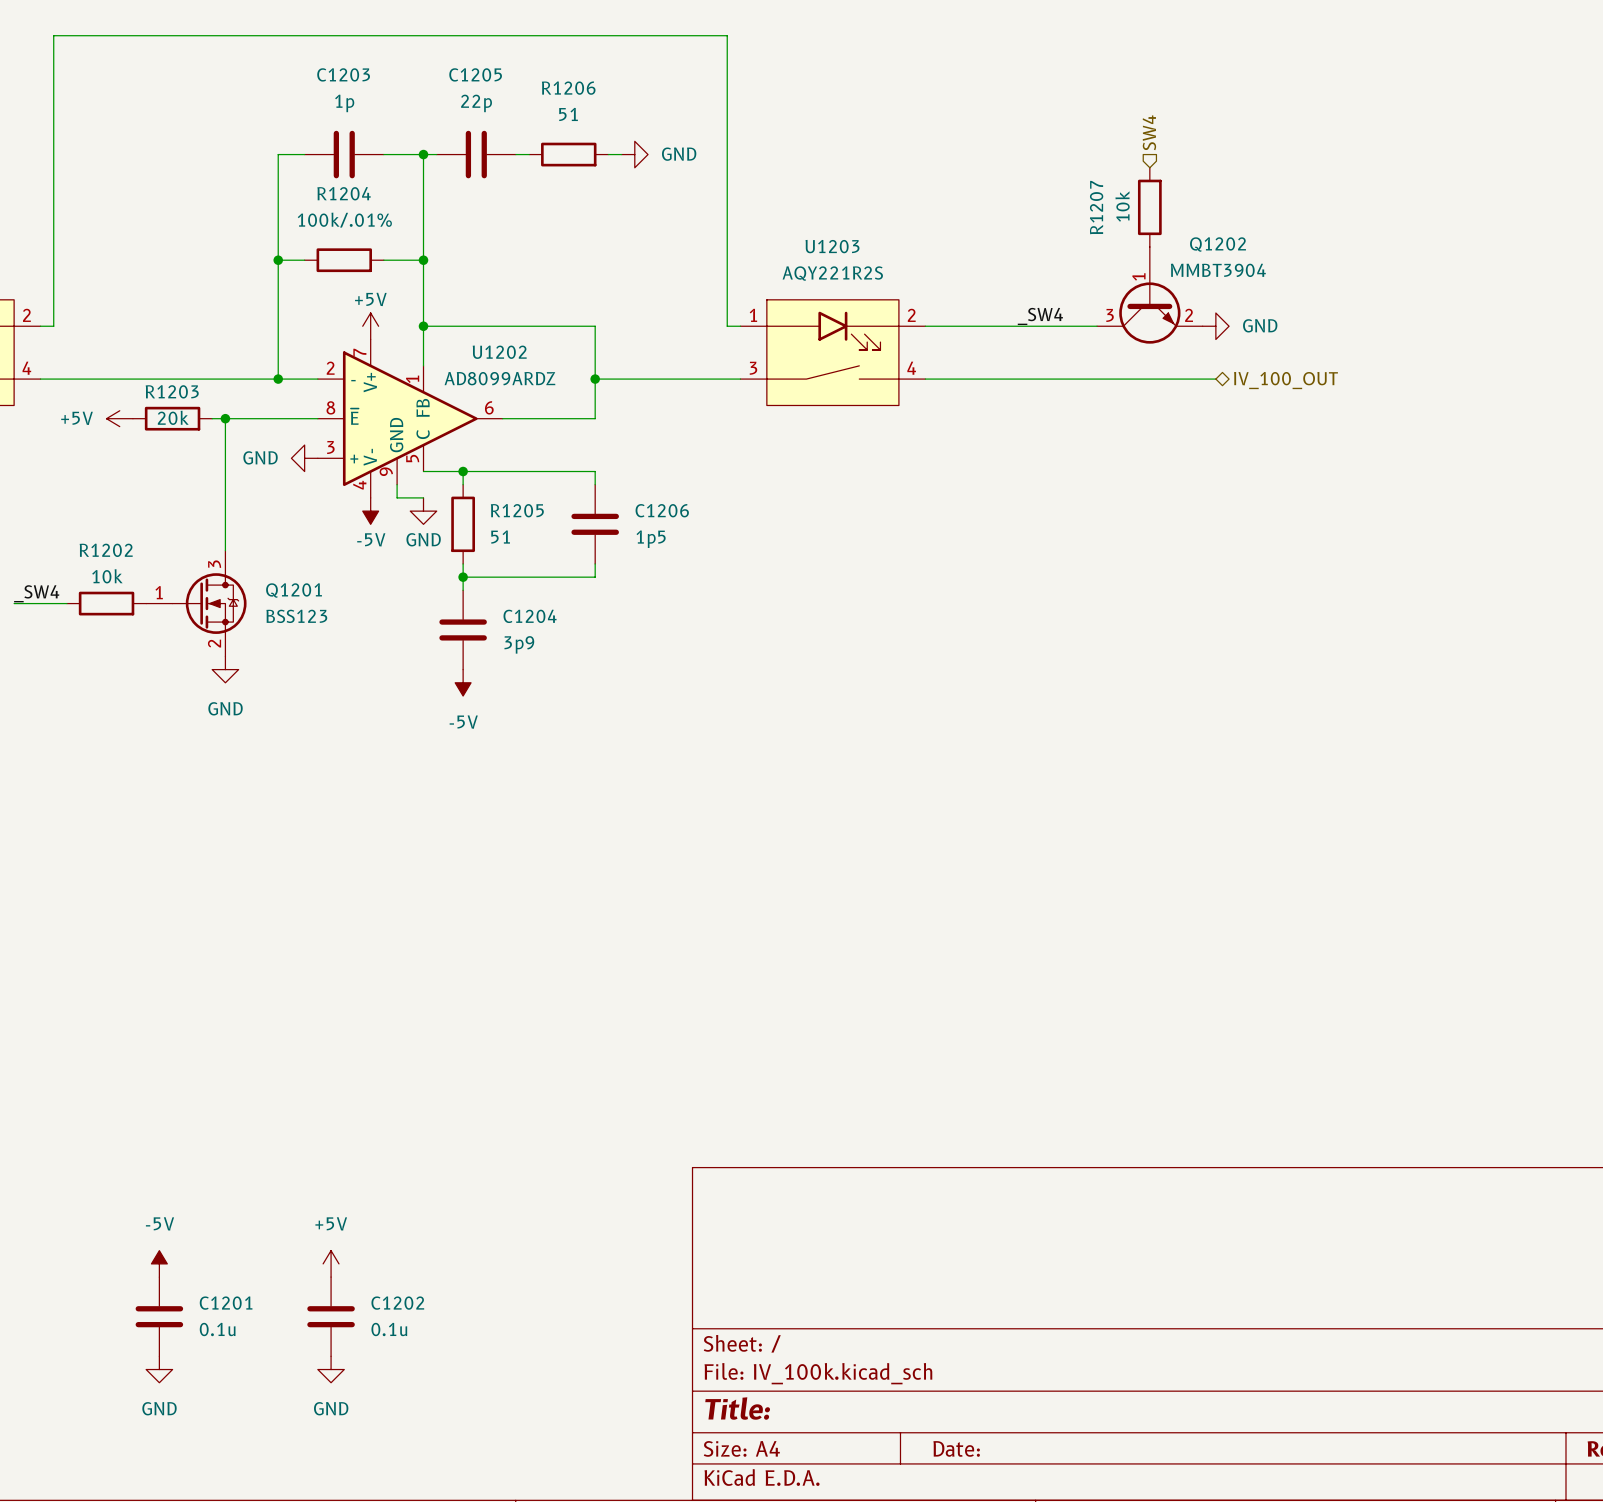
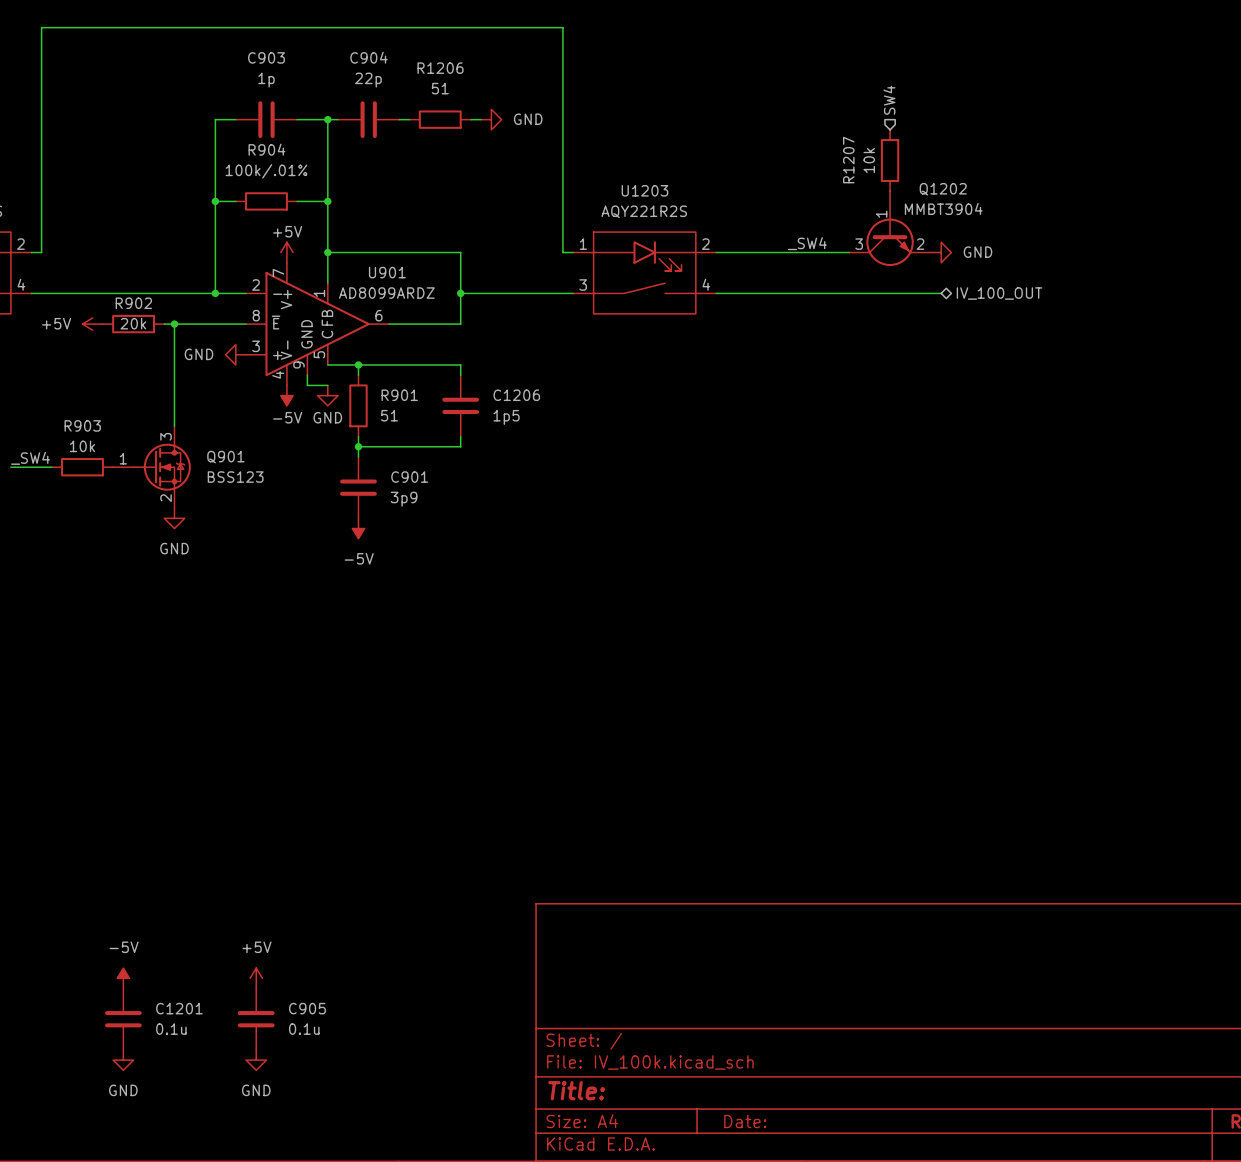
C1203 name: C1203 (343, 74) -> C903 (266, 57)
C1205 name: C1205 (475, 74) -> C904 (368, 57)
R1204 name: R1204 (344, 193) -> R904 (266, 149)
U1202 name: U1202 (499, 352) -> U901 (387, 272)
R1203 name: R1203 (172, 391) -> R902 (133, 303)
R1205 name: R1205 (517, 510) -> R901 (399, 395)
R1202 name: R1202 (106, 550) -> R903 (82, 425)
Q1201 name: Q1201 (294, 590) -> Q901 (225, 457)
C1204 name: C1204 (530, 616) -> C901 (409, 477)
C1202 name: C1202 (397, 1303) -> C905 (307, 1008)

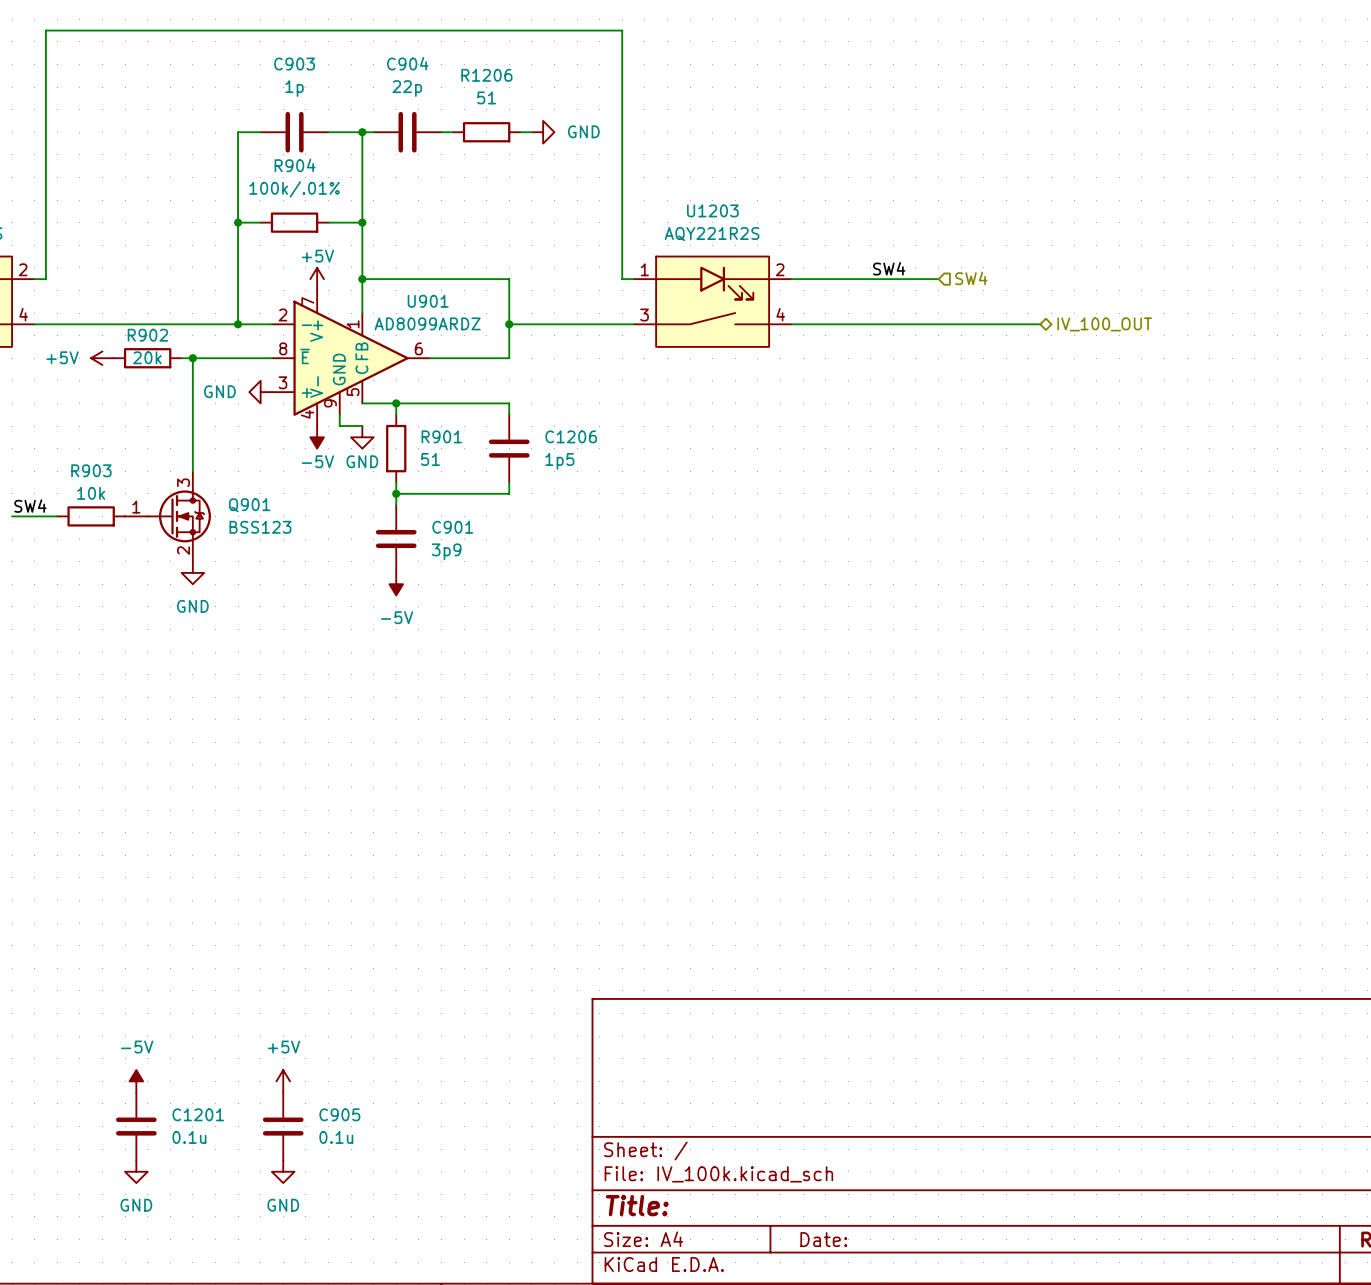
hierarchical label rotation: 0° (889, 100) -> 90° clockwise (971, 278)
hierarchical label position: SW4 (889, 100) -> SW4 (971, 278)
R1207: 10k (890, 160) -> none
Q1202: MMBT3904 (890, 228) -> none
label: _SW4 (807, 243) -> SW4 (889, 268)
power symbol: GND (941, 252) -> none
label: _SW4 (30, 458) -> SW4 (30, 506)

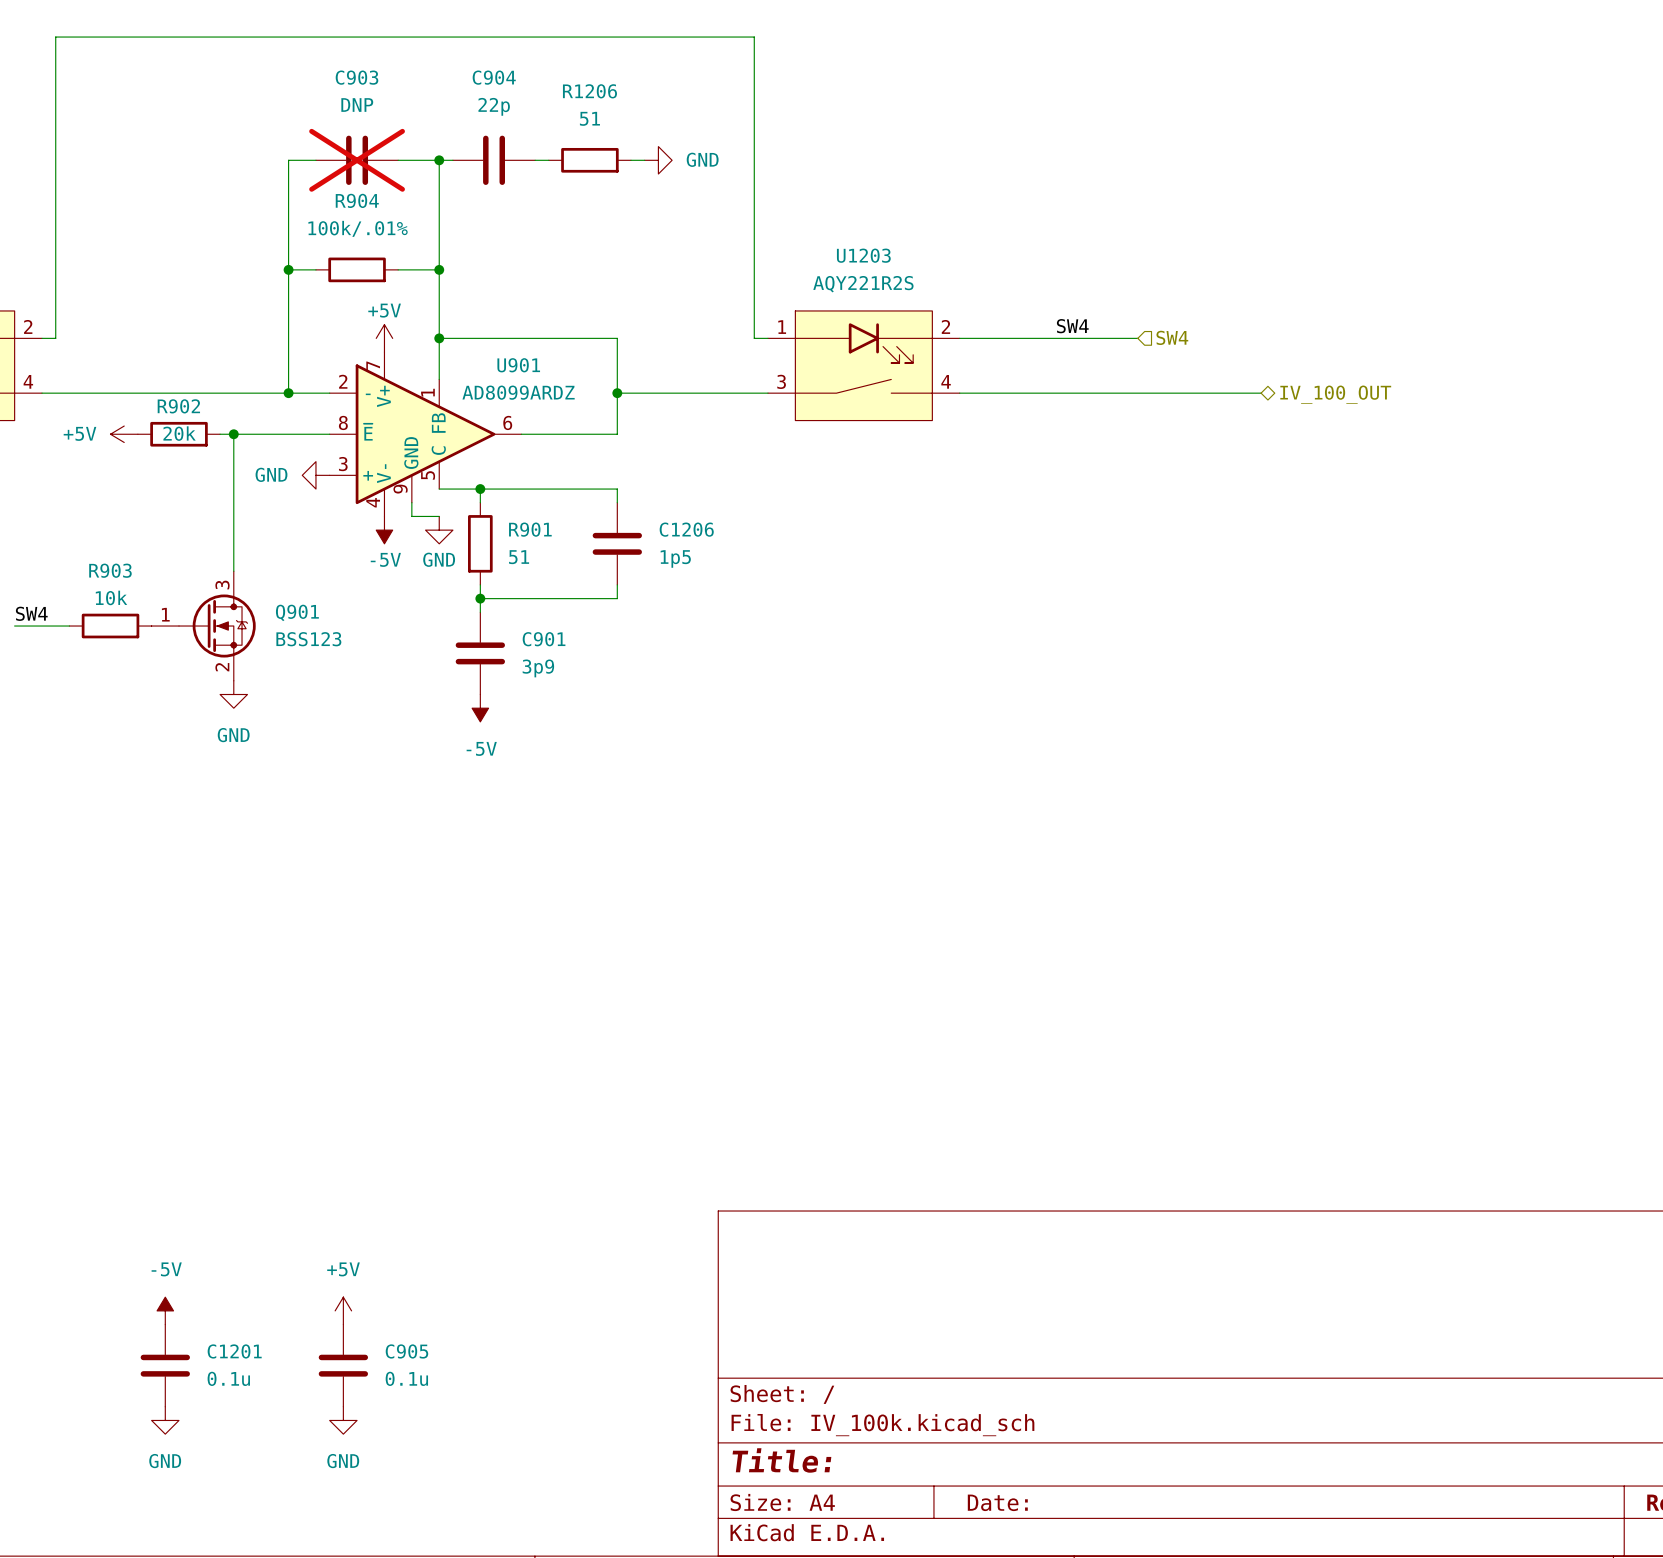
C903 value: 1p (294, 88) -> DNP (357, 105)
C903 do-not-place cross: none -> (357, 160)

